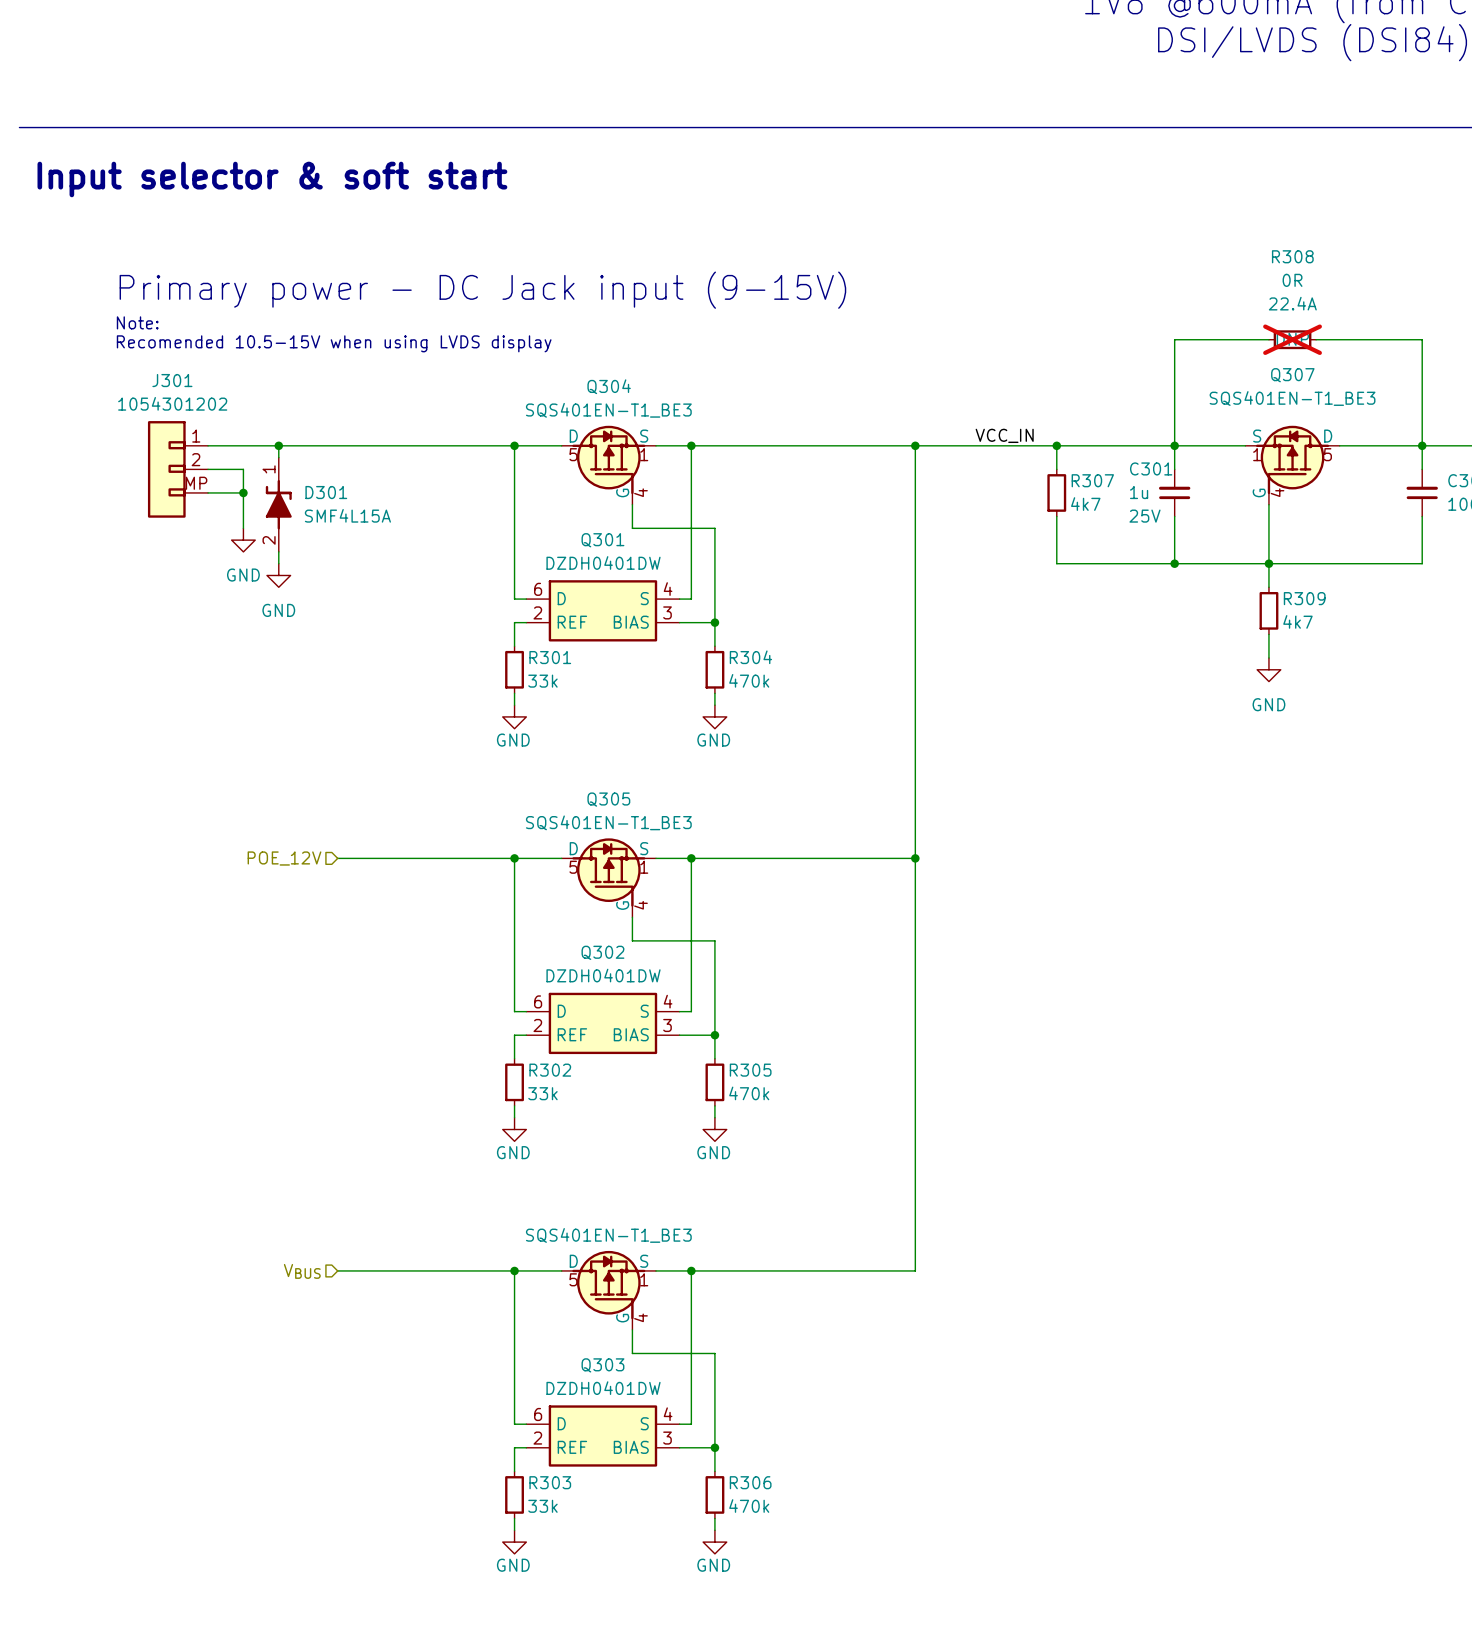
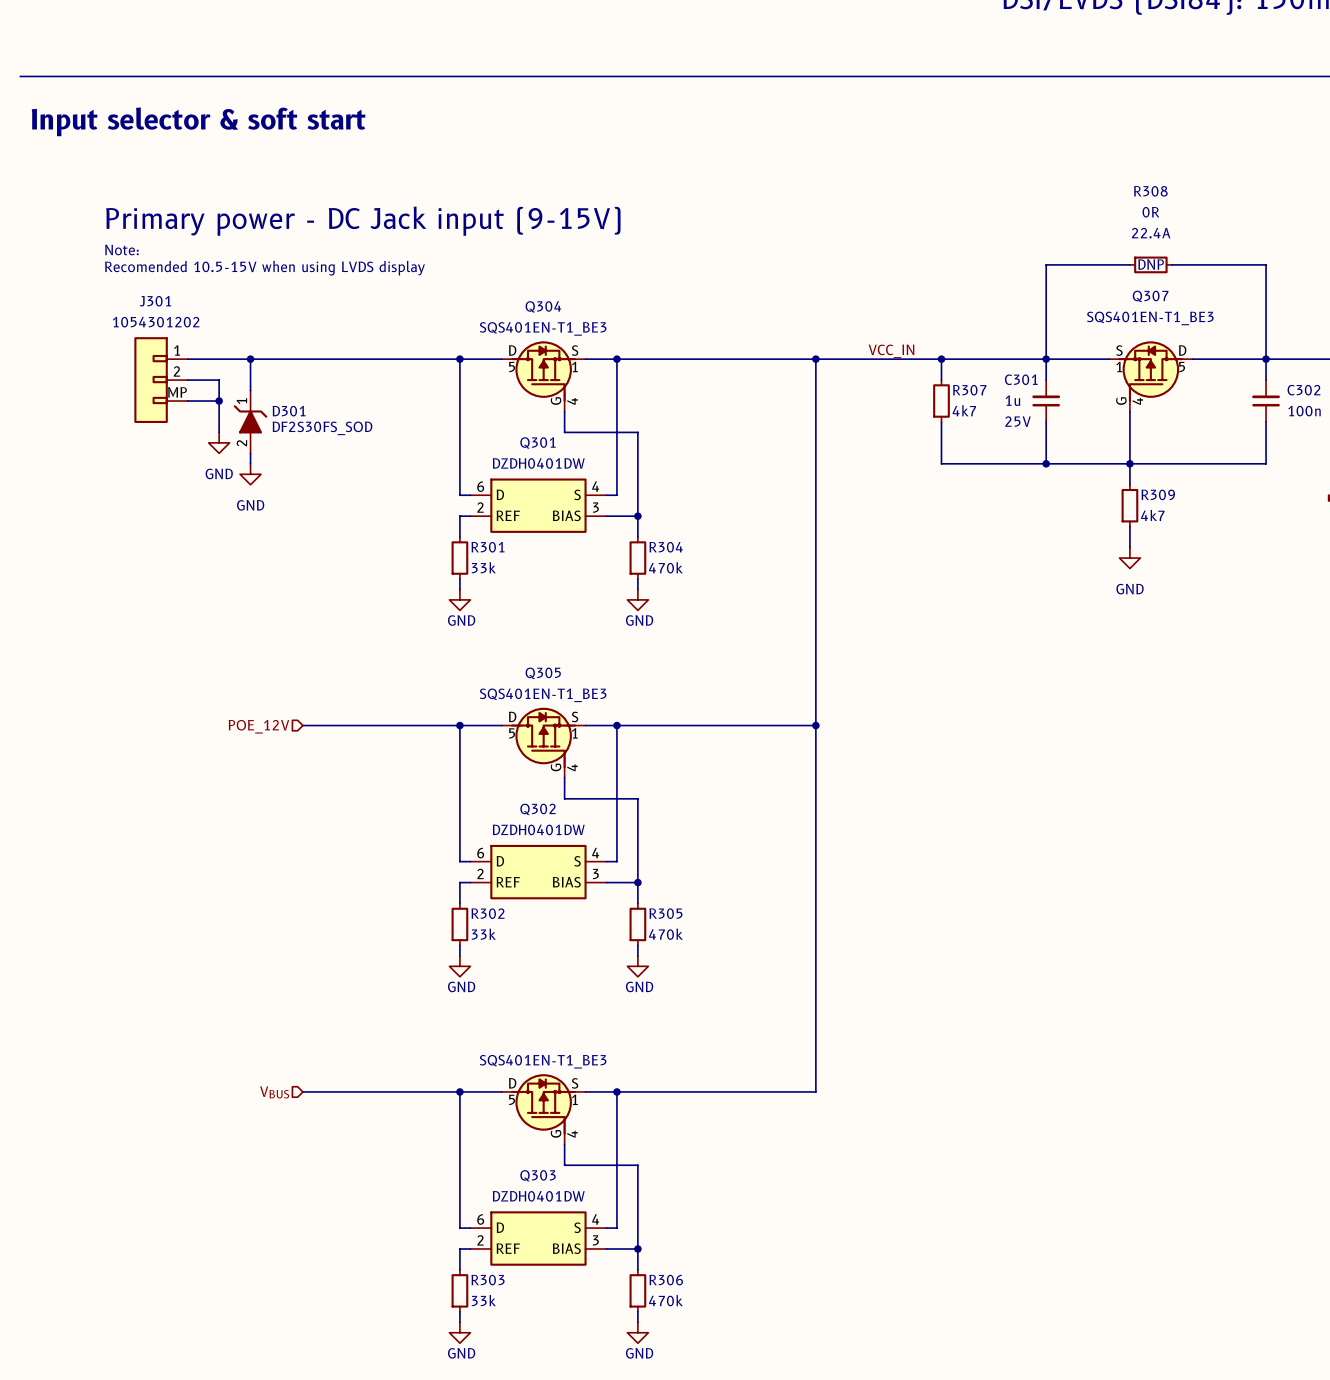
R308 do-not-place cross: (1292, 339) -> none
D301 symbol: [265, 457, 292, 552] -> [233, 390, 268, 454]
D301 value: SMF4L15A (347, 515) -> DF2S30FS_SOD (322, 428)

